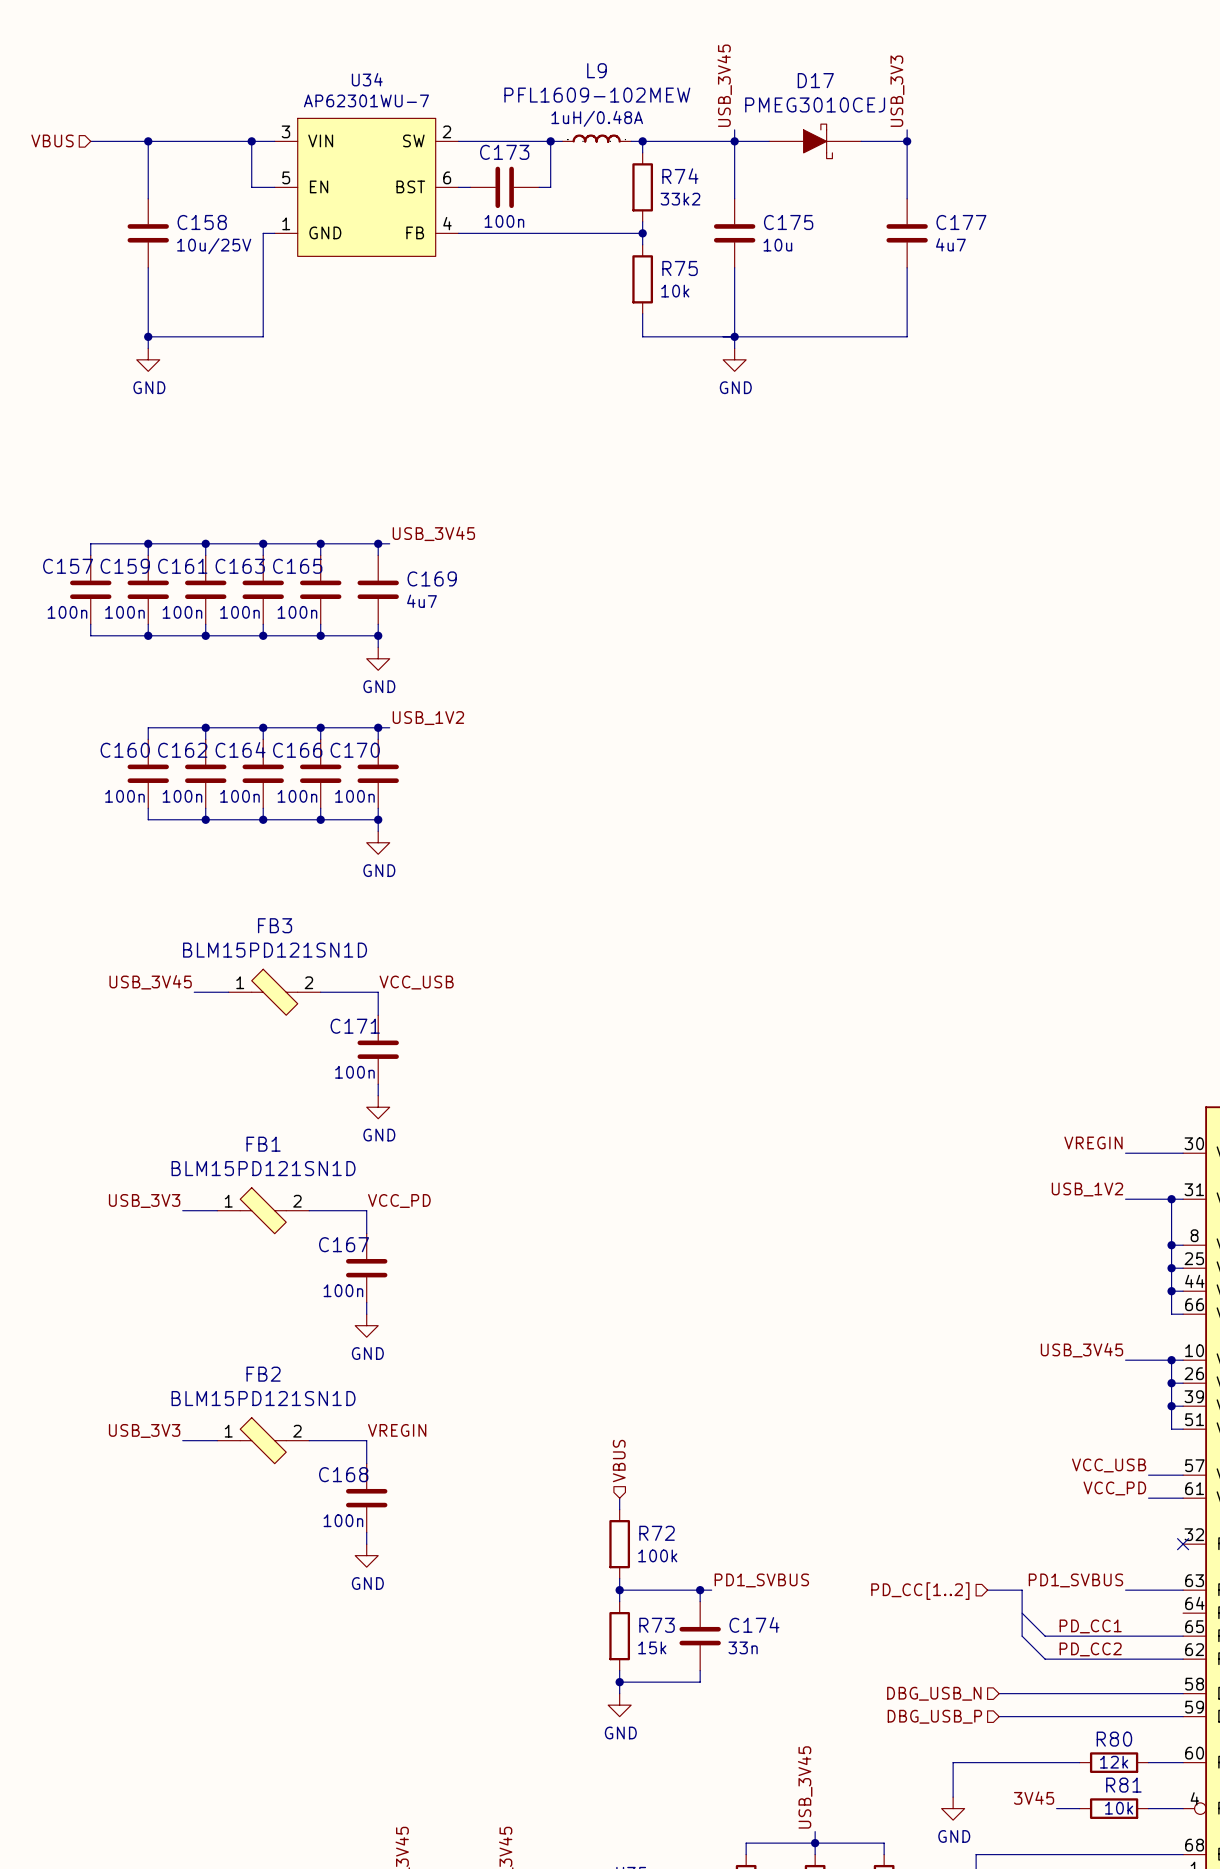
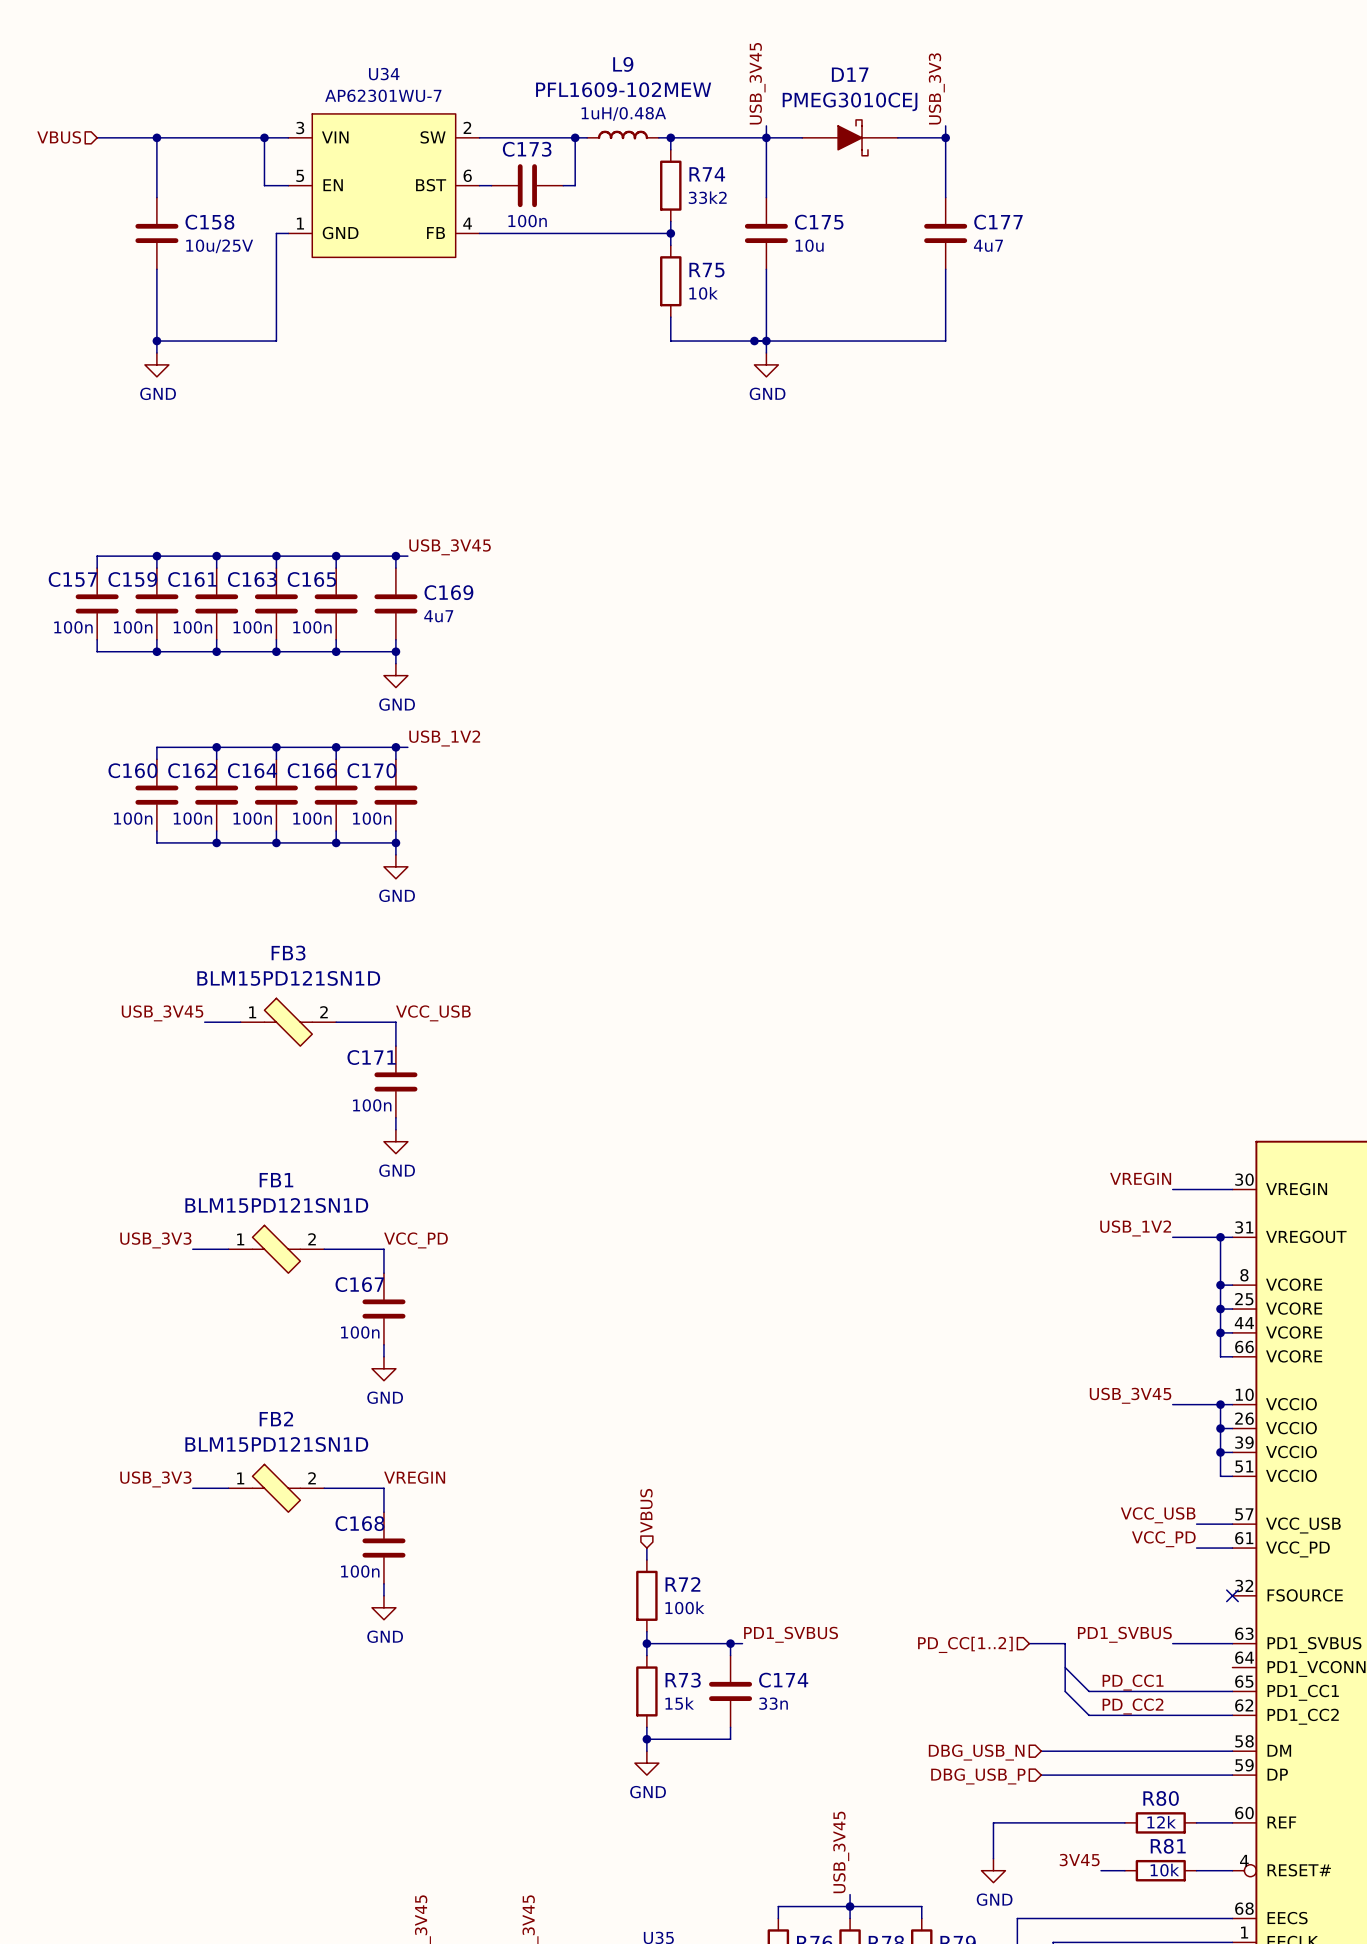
junction: none -> (754, 341)

